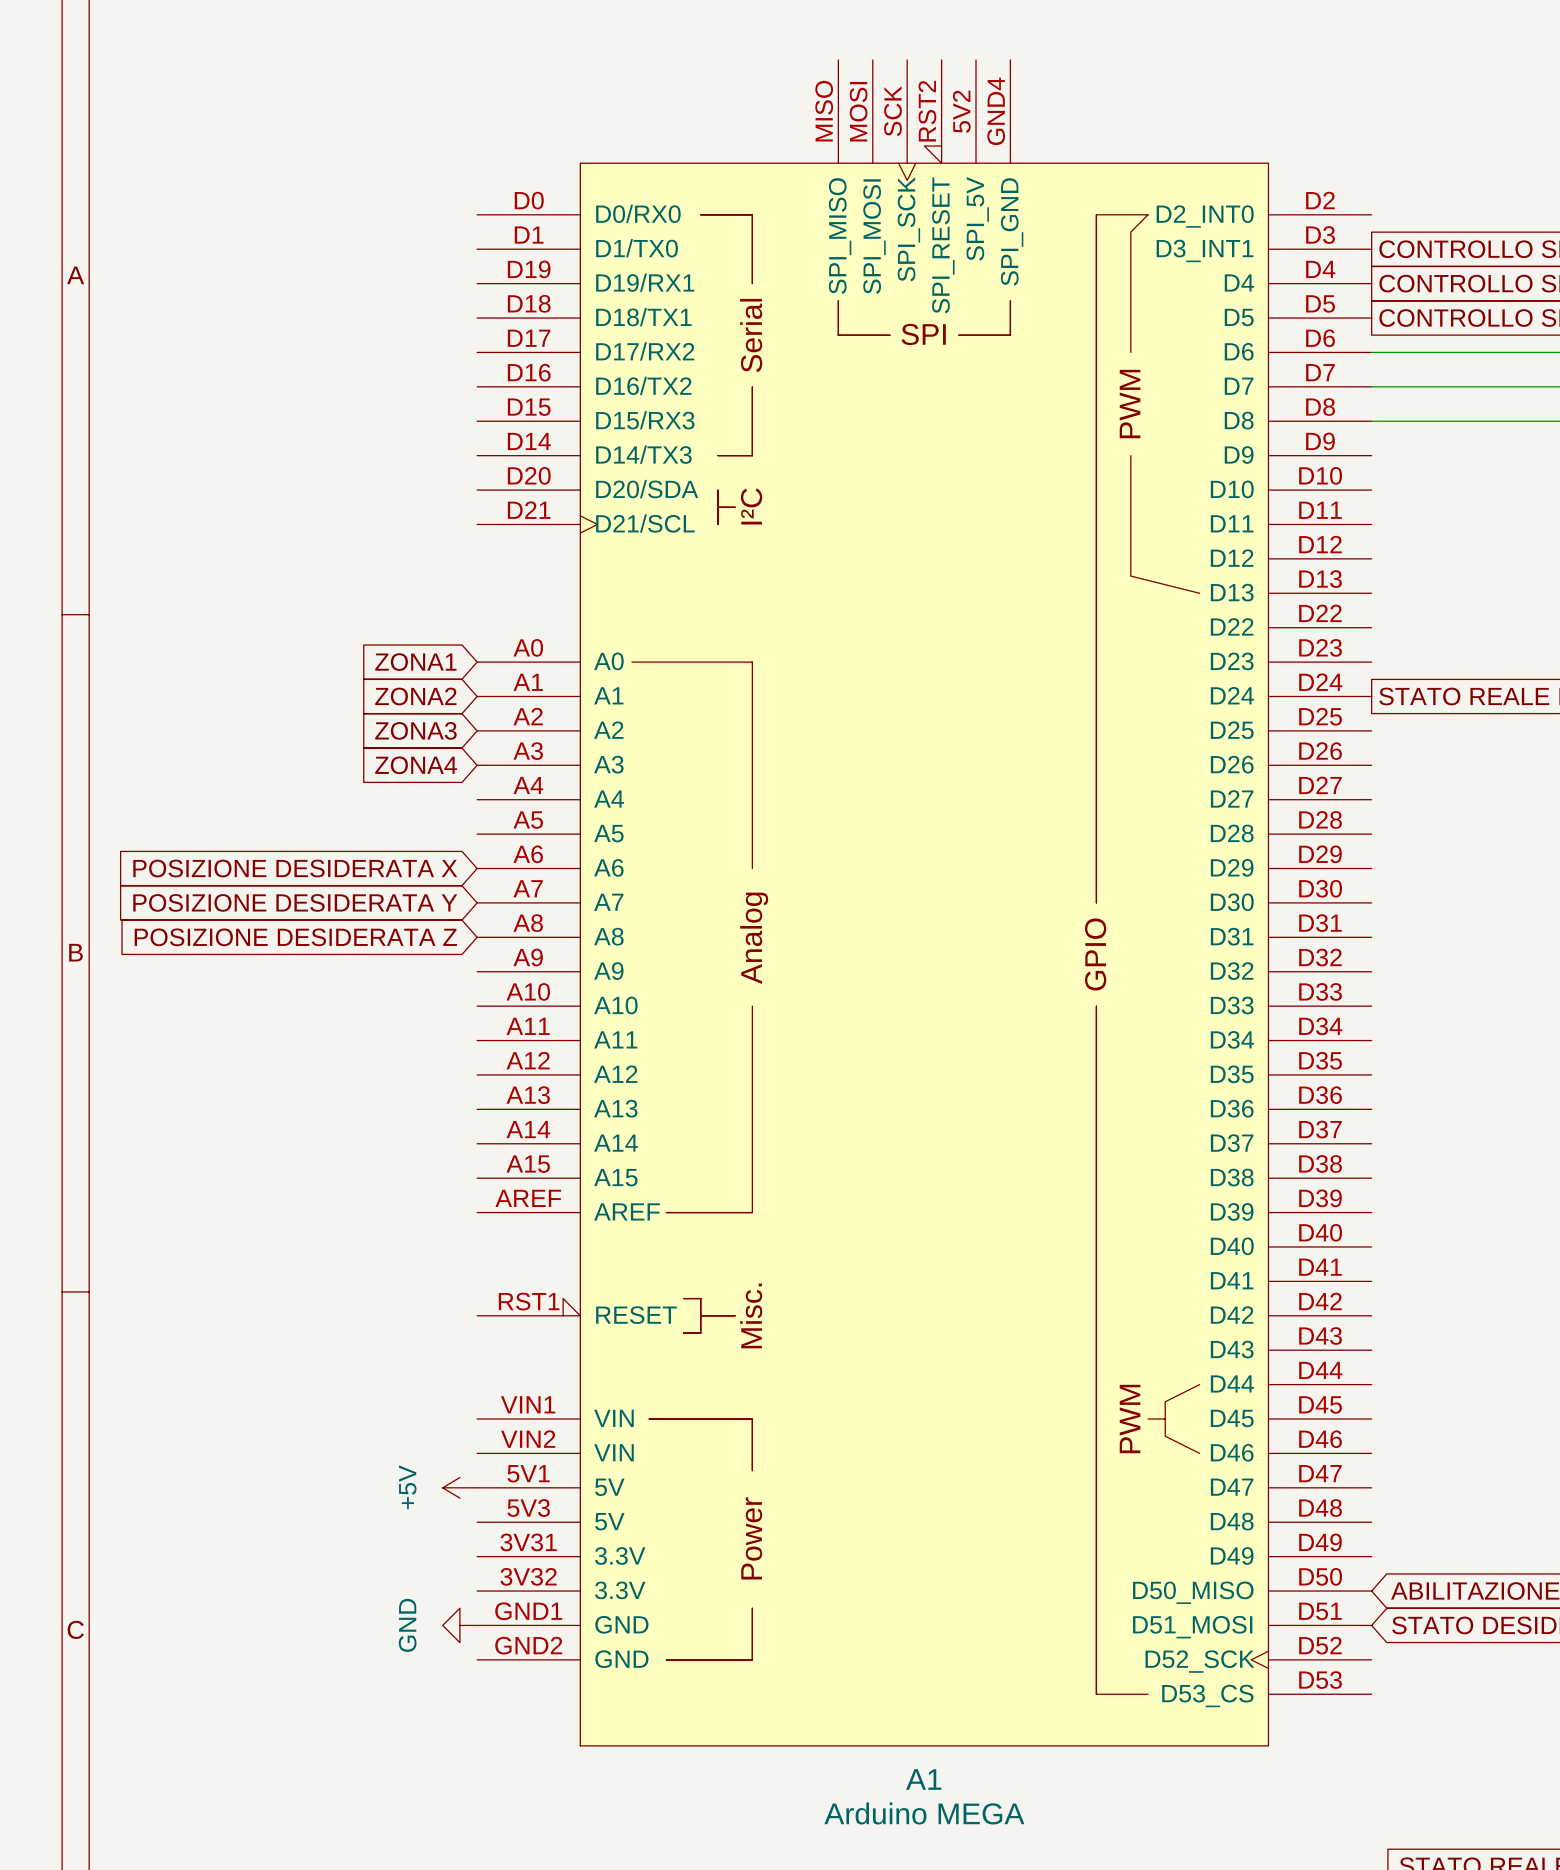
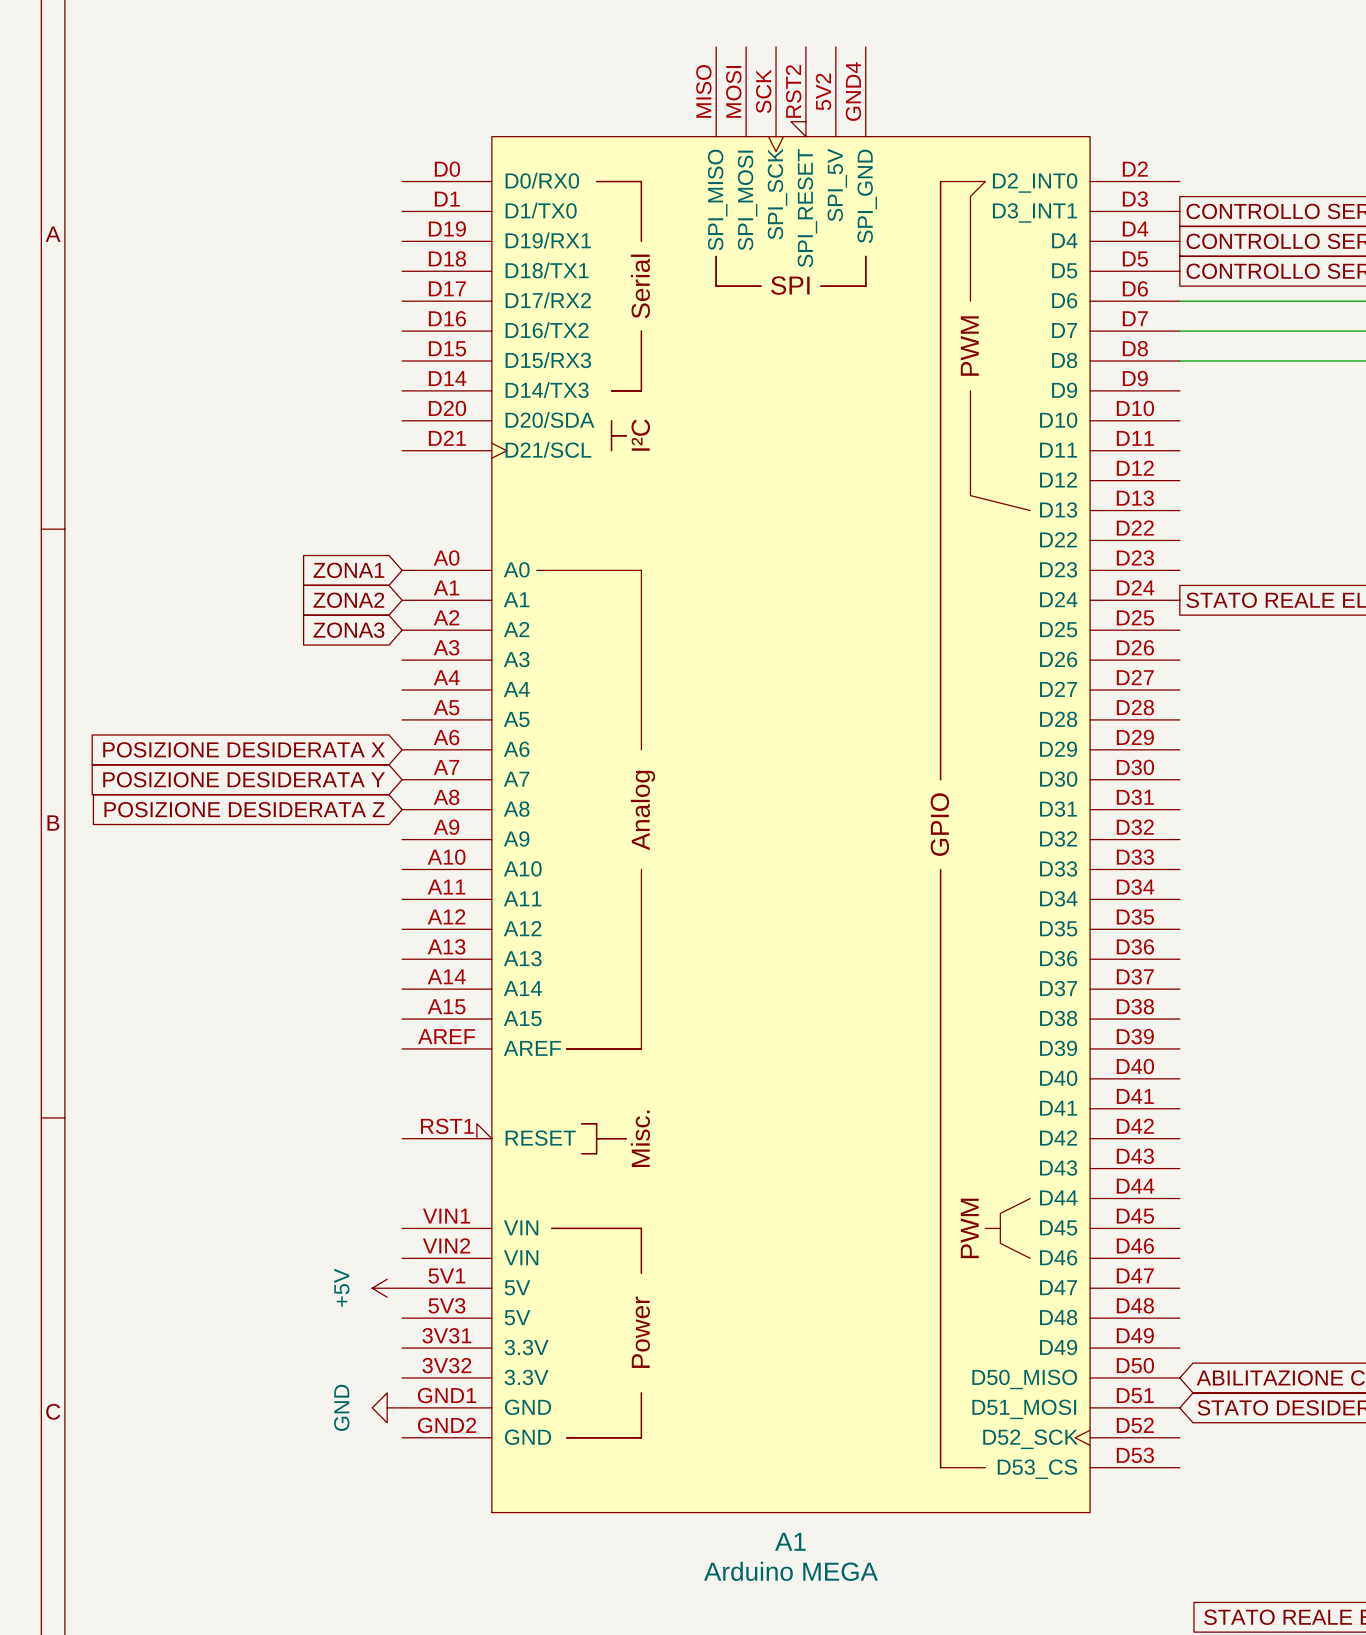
global label: ZONA4 (416, 765) -> none

